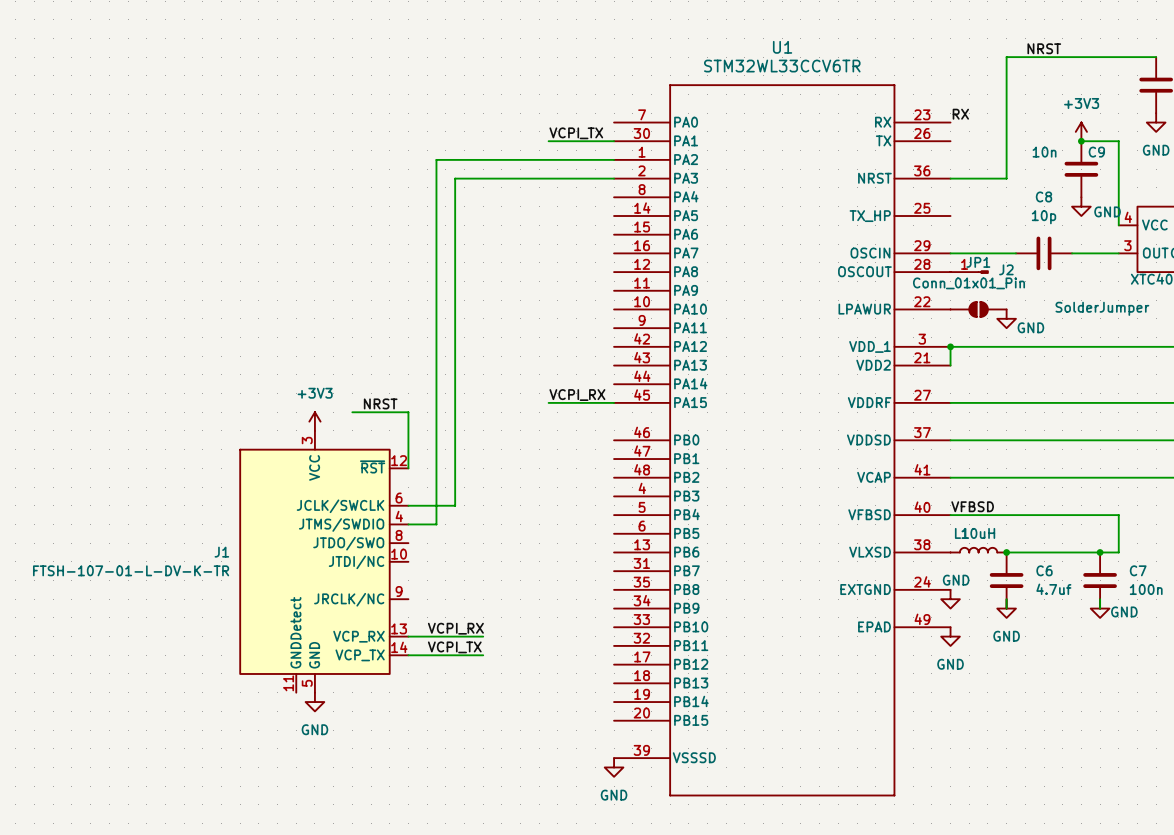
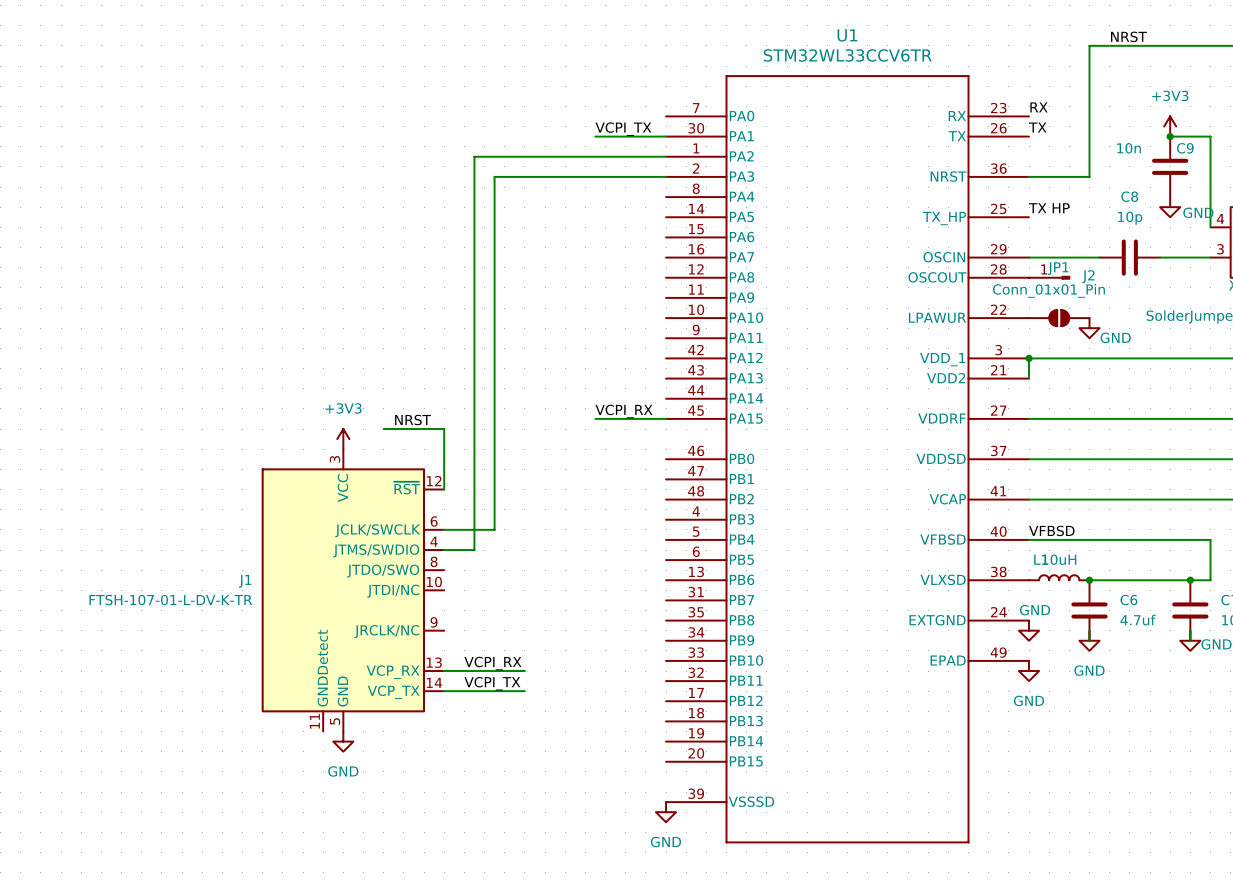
label: none -> TX (1037, 127)
label: none -> TX HP (1049, 208)

